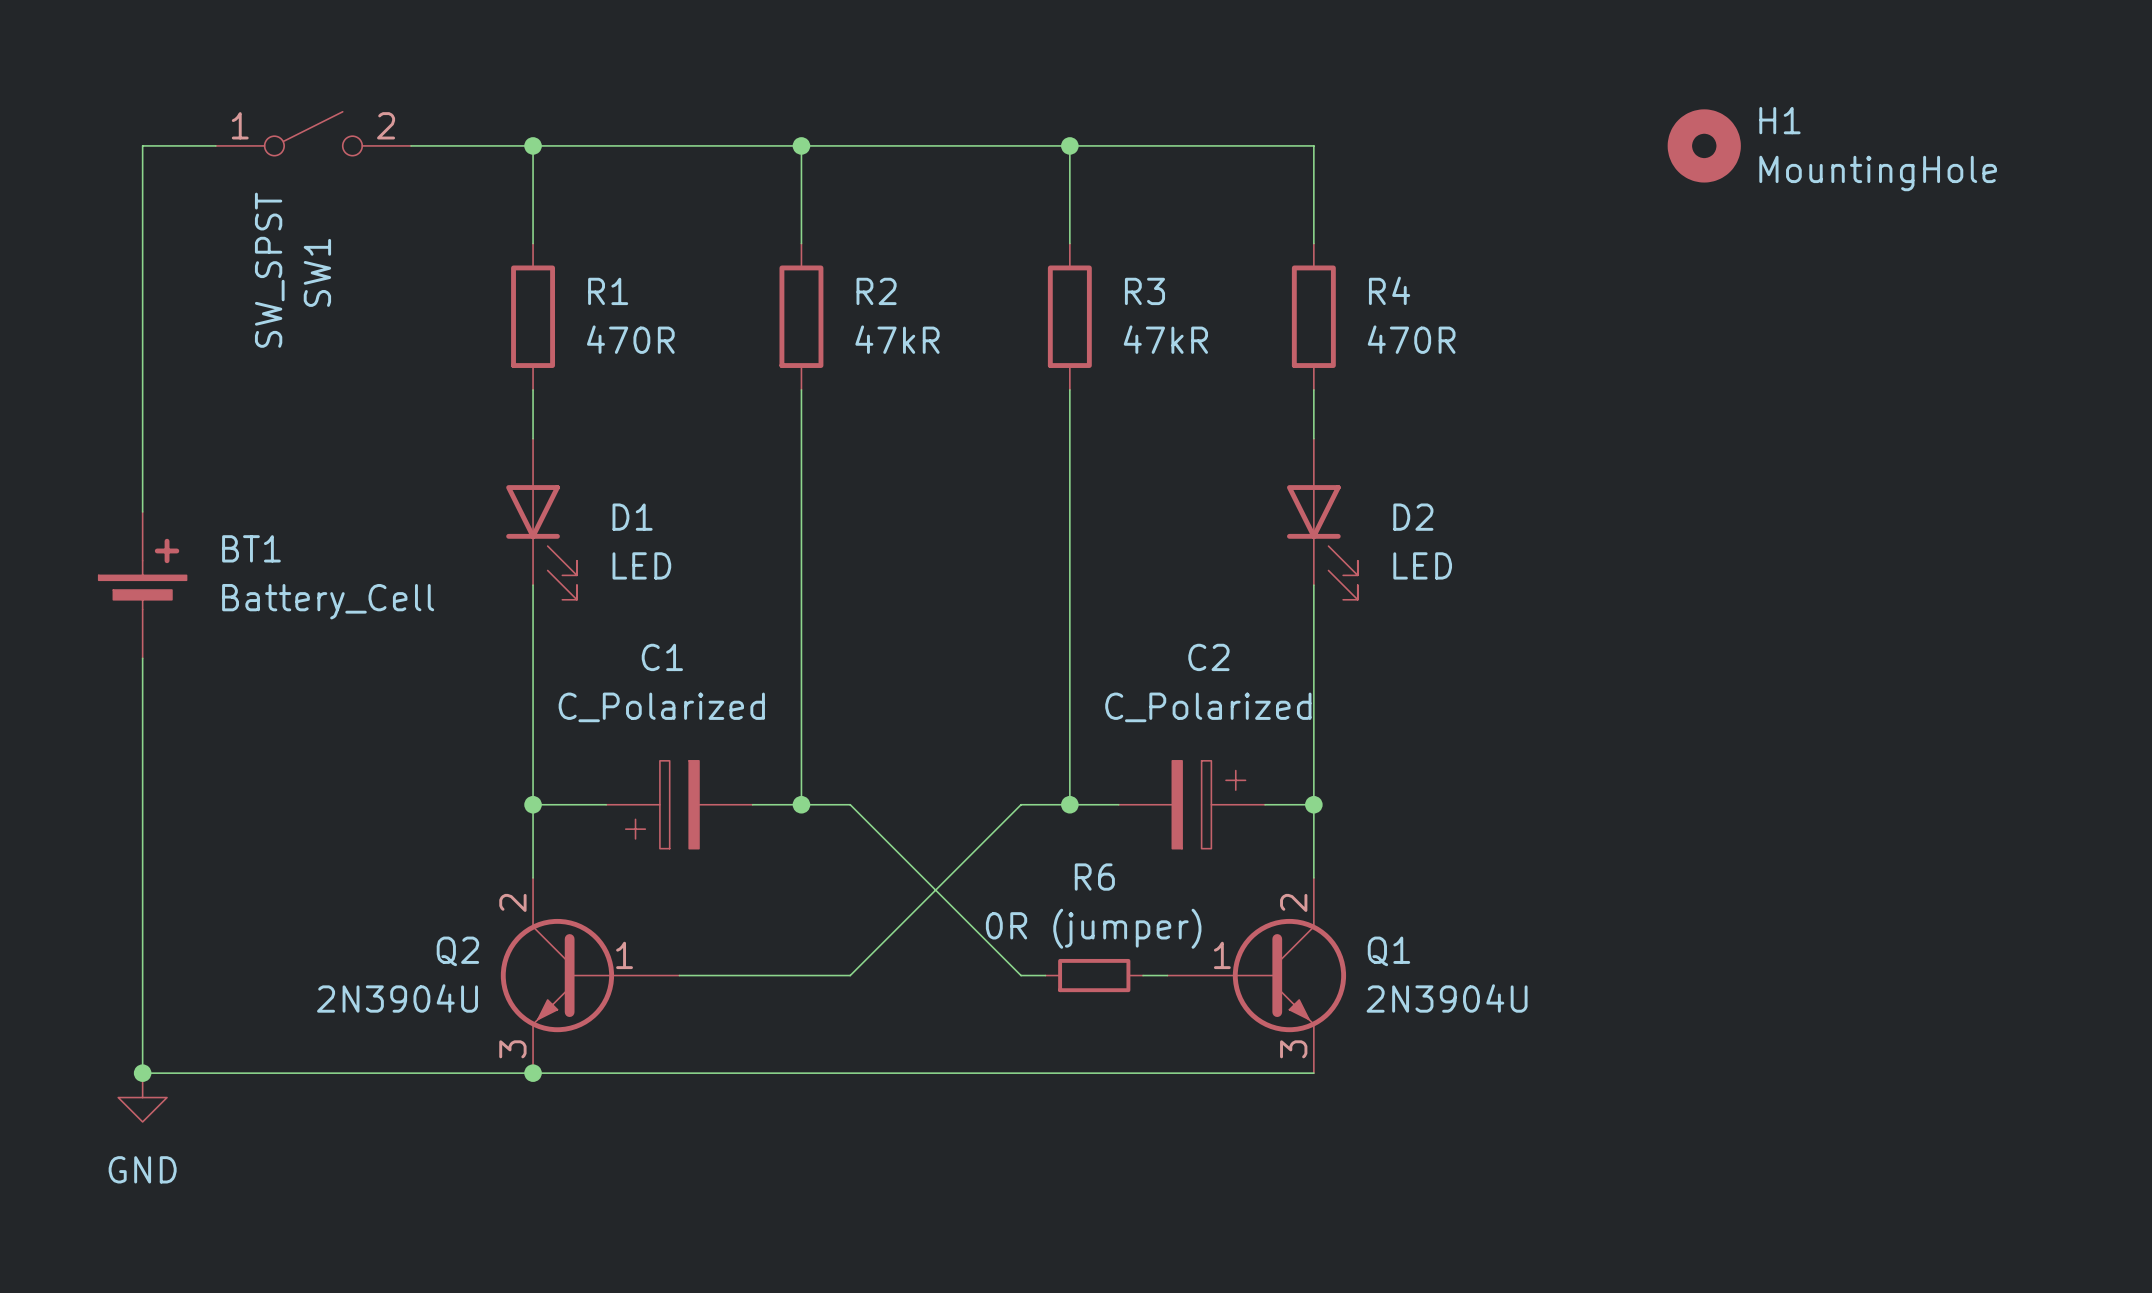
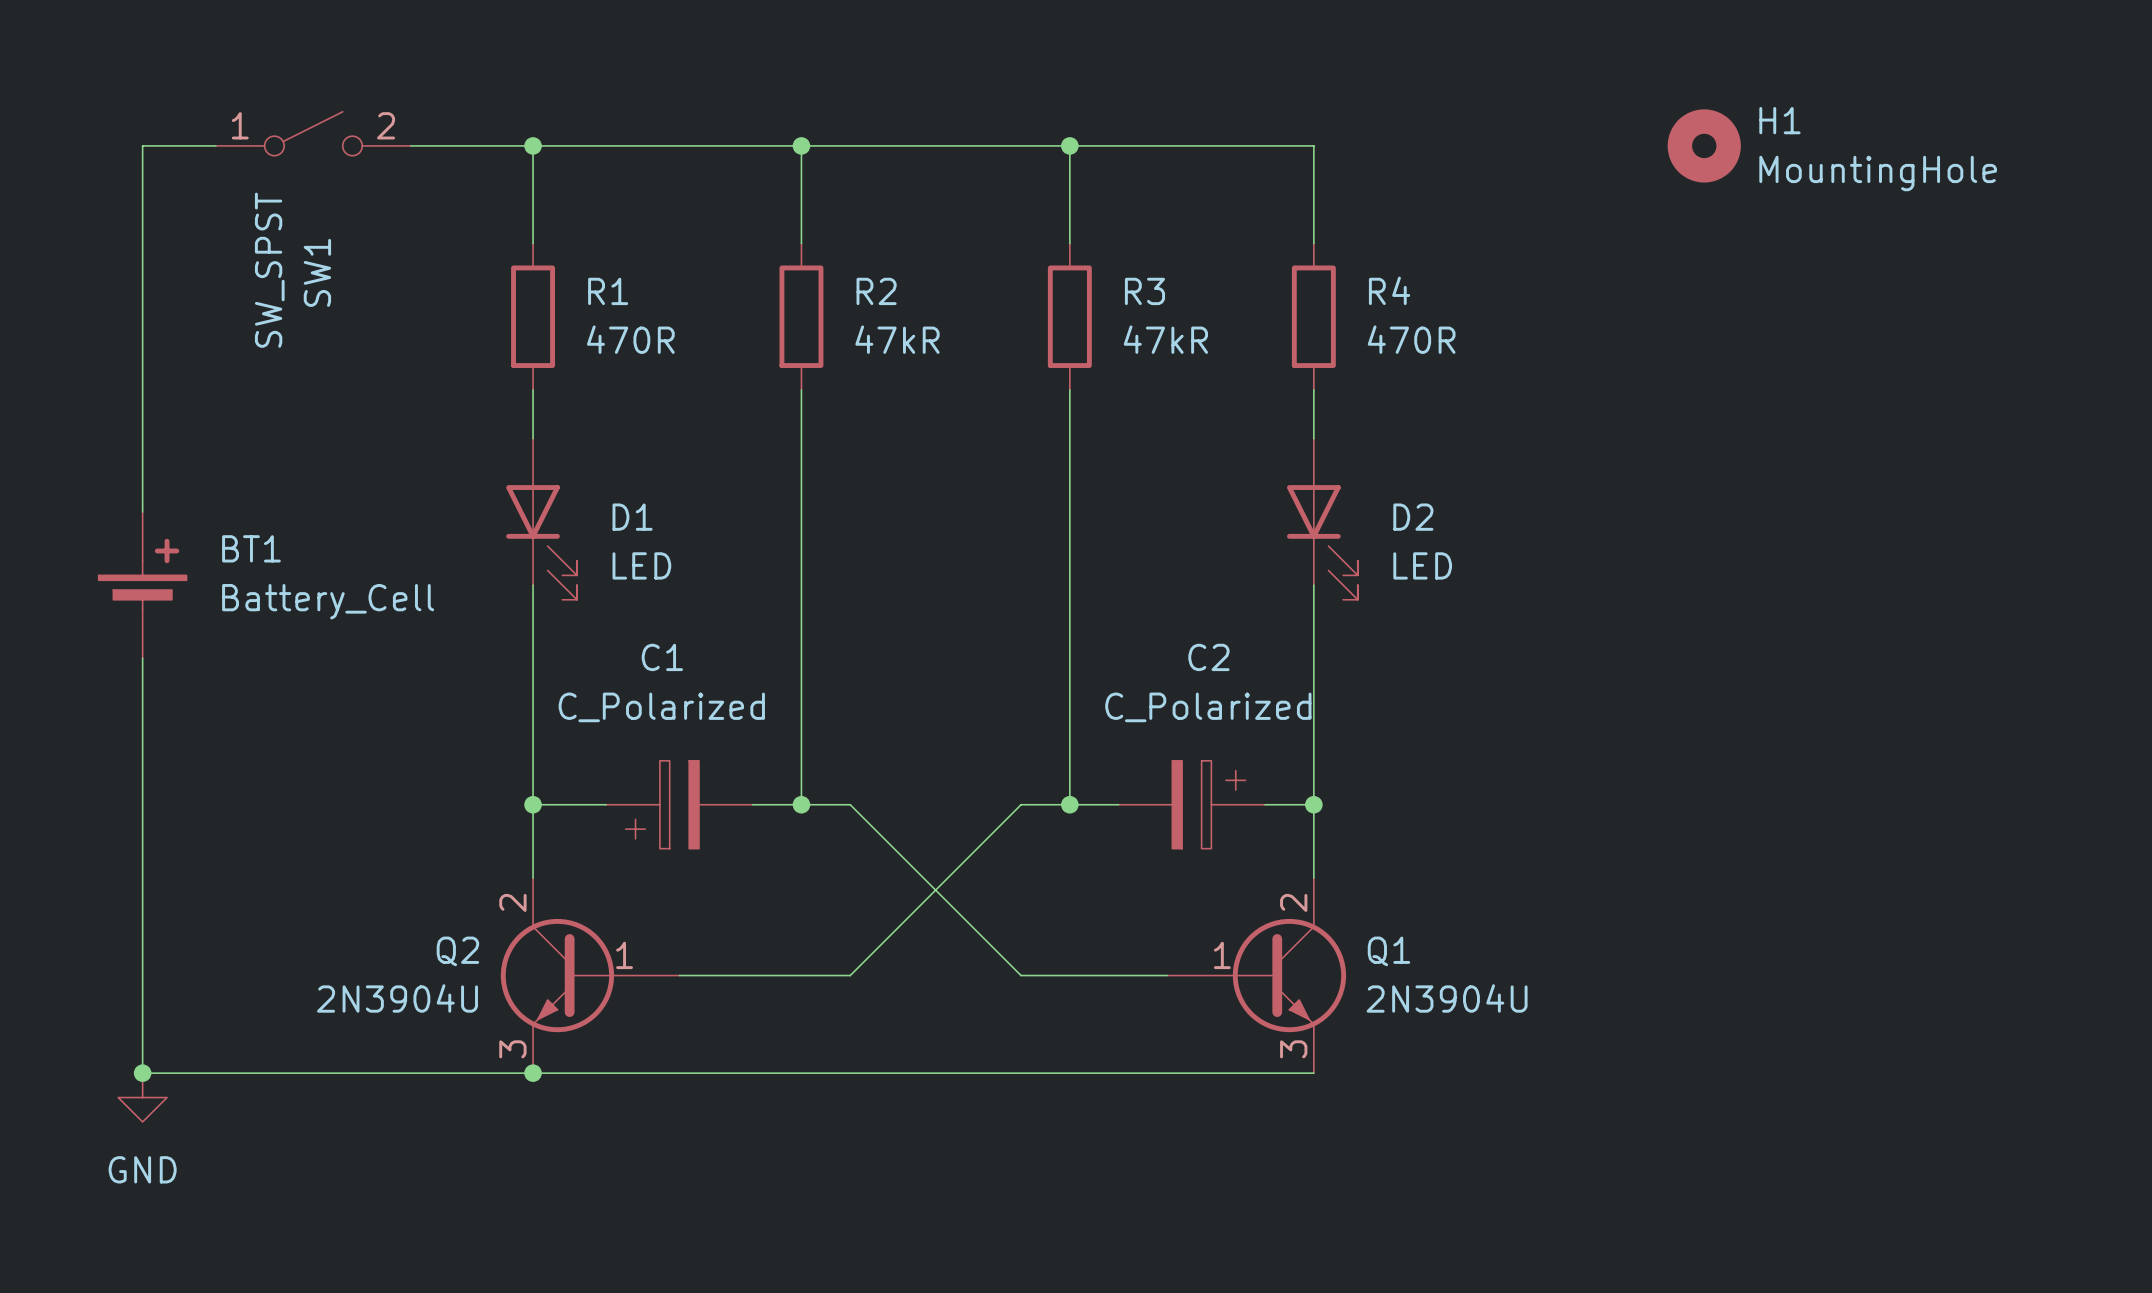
wire: none -> (1045, 975) (1143, 975)
R6: 0R (jumper) (1094, 975) -> none

